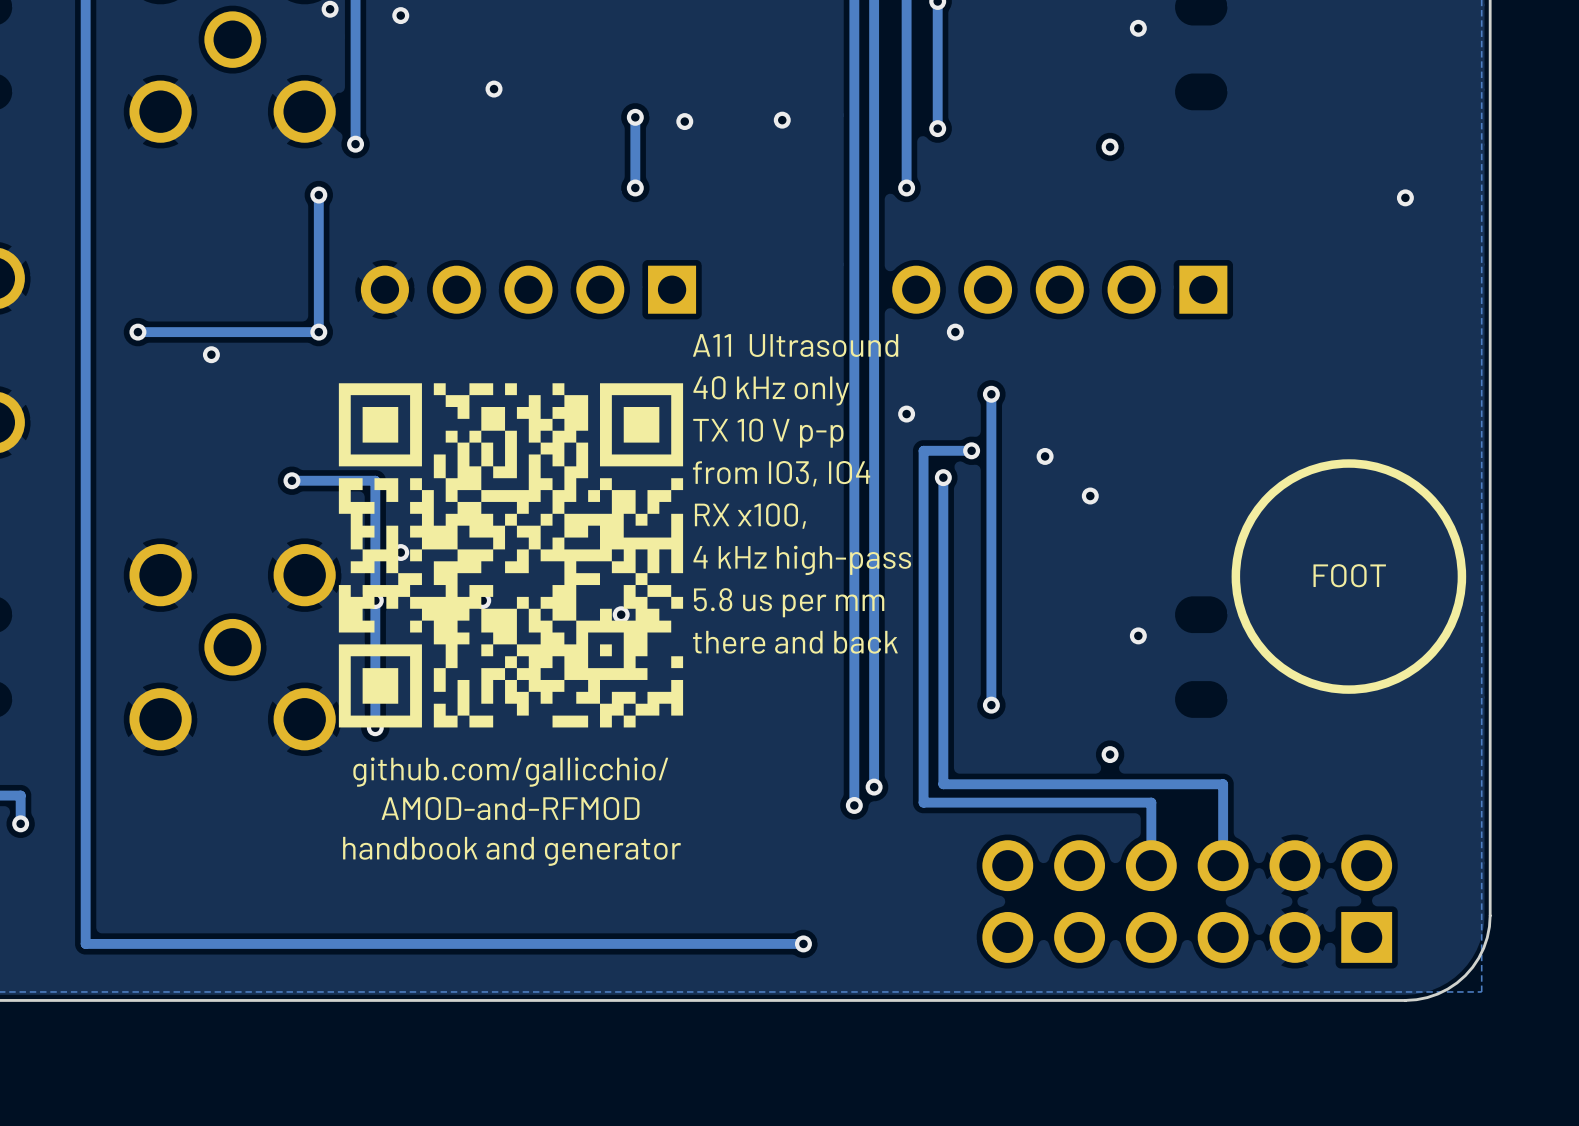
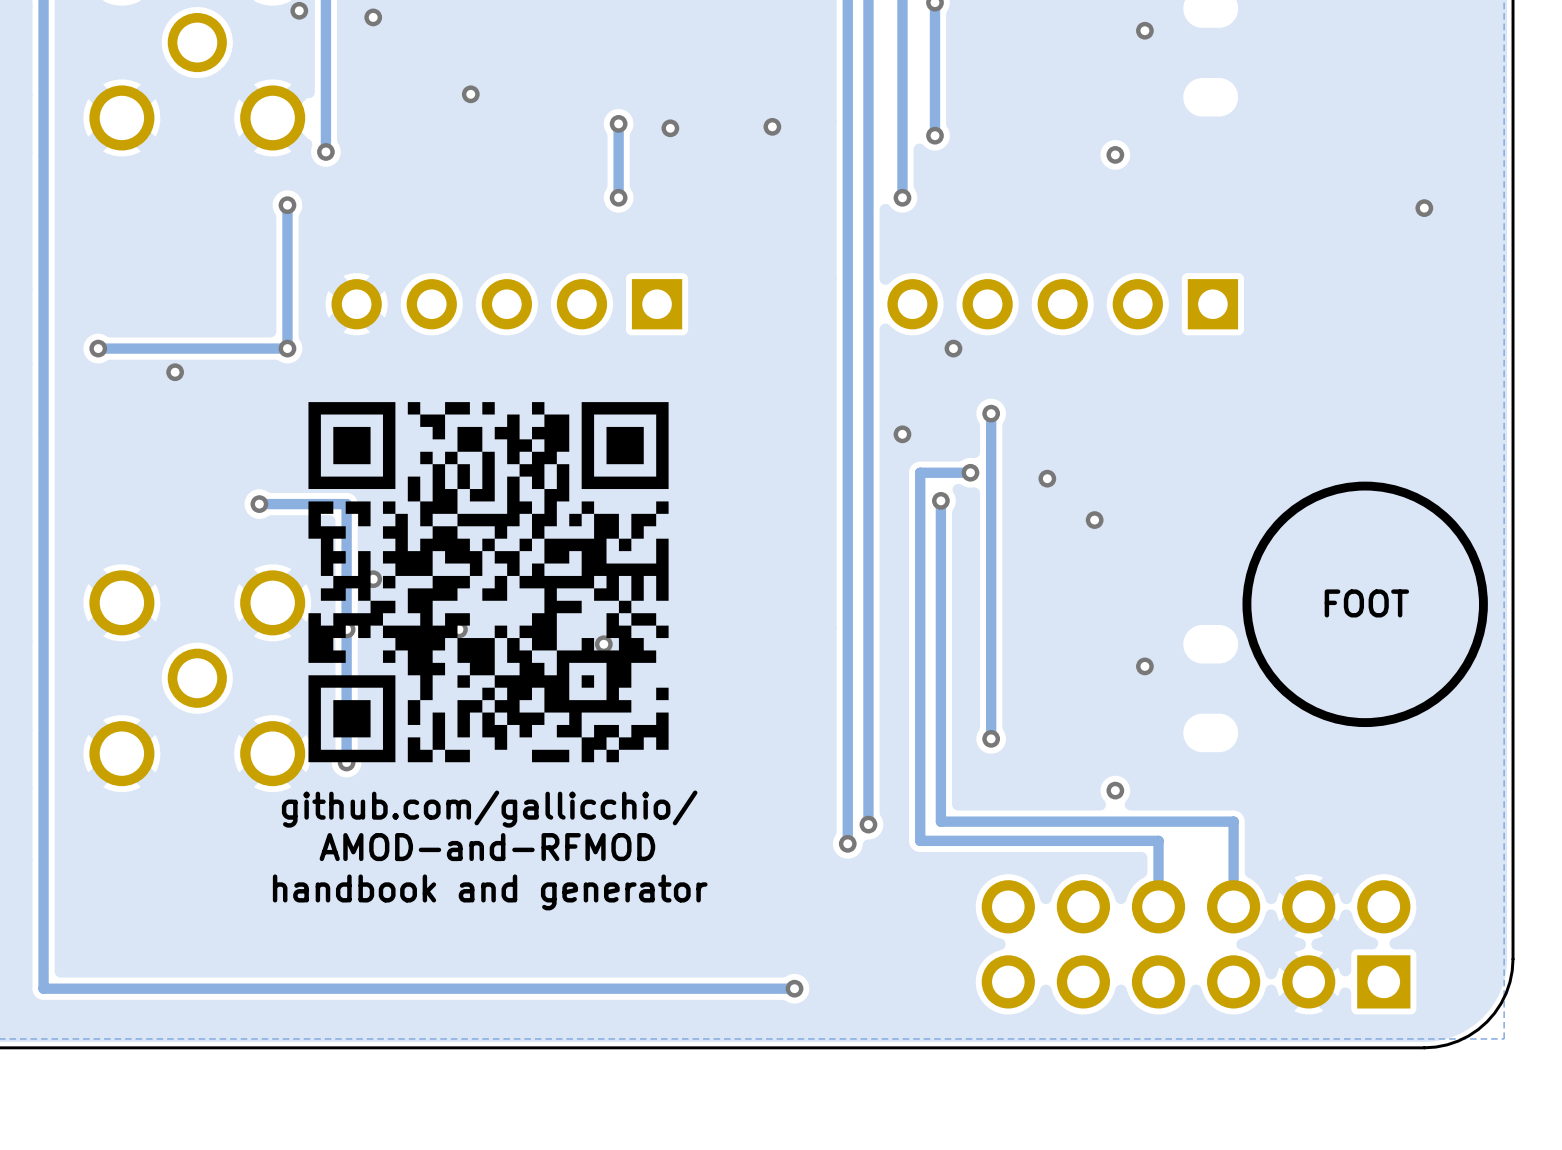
text: A11 Ultrasound (795, 345) -> none
text: 40 kHz only (771, 390) -> none
text: TX 10 V p-p (768, 433) -> none
text: from IO3, IO4 (781, 473) -> none
text: RX x100, (750, 516) -> none
text: 4 kHz high-pass (802, 560) -> none
text: 5.8 us per mm (789, 602) -> none
text: there and back (795, 642) -> none

